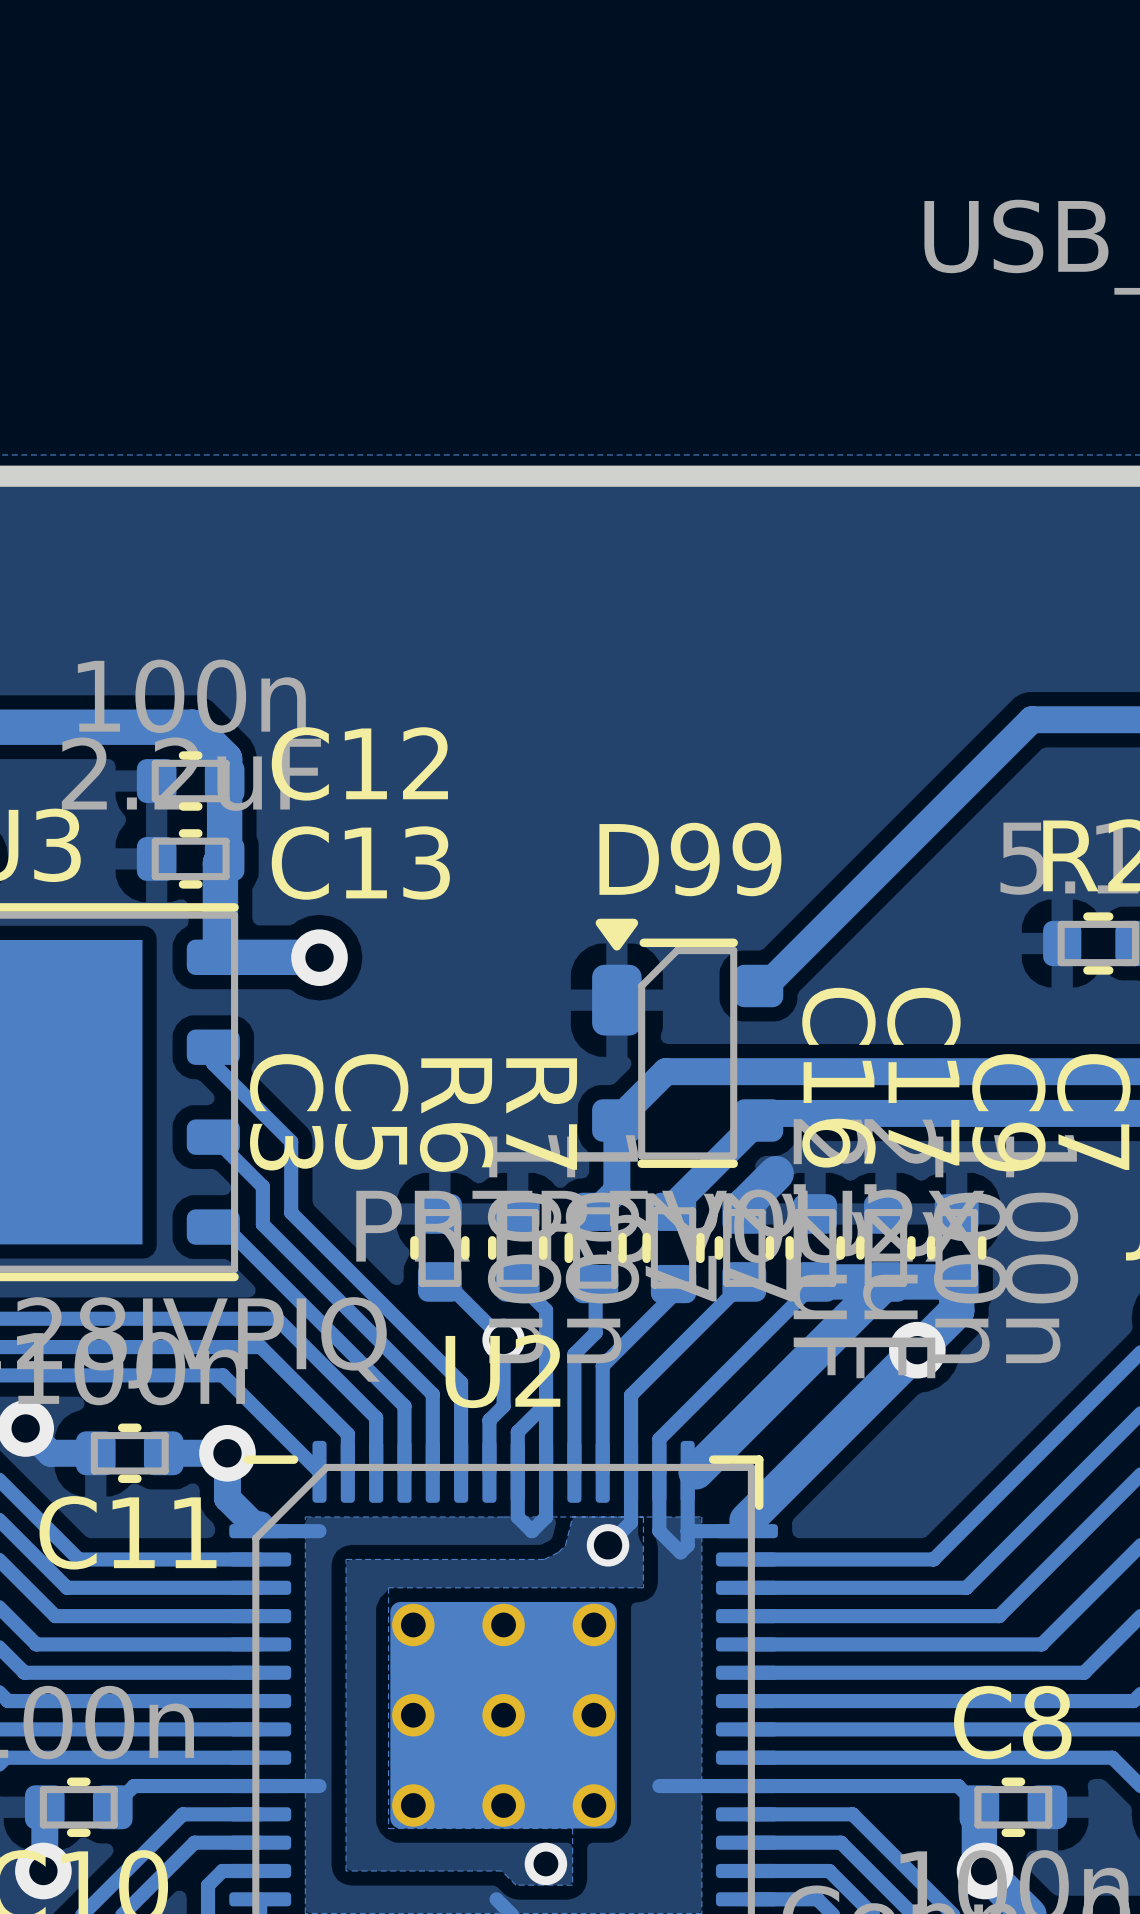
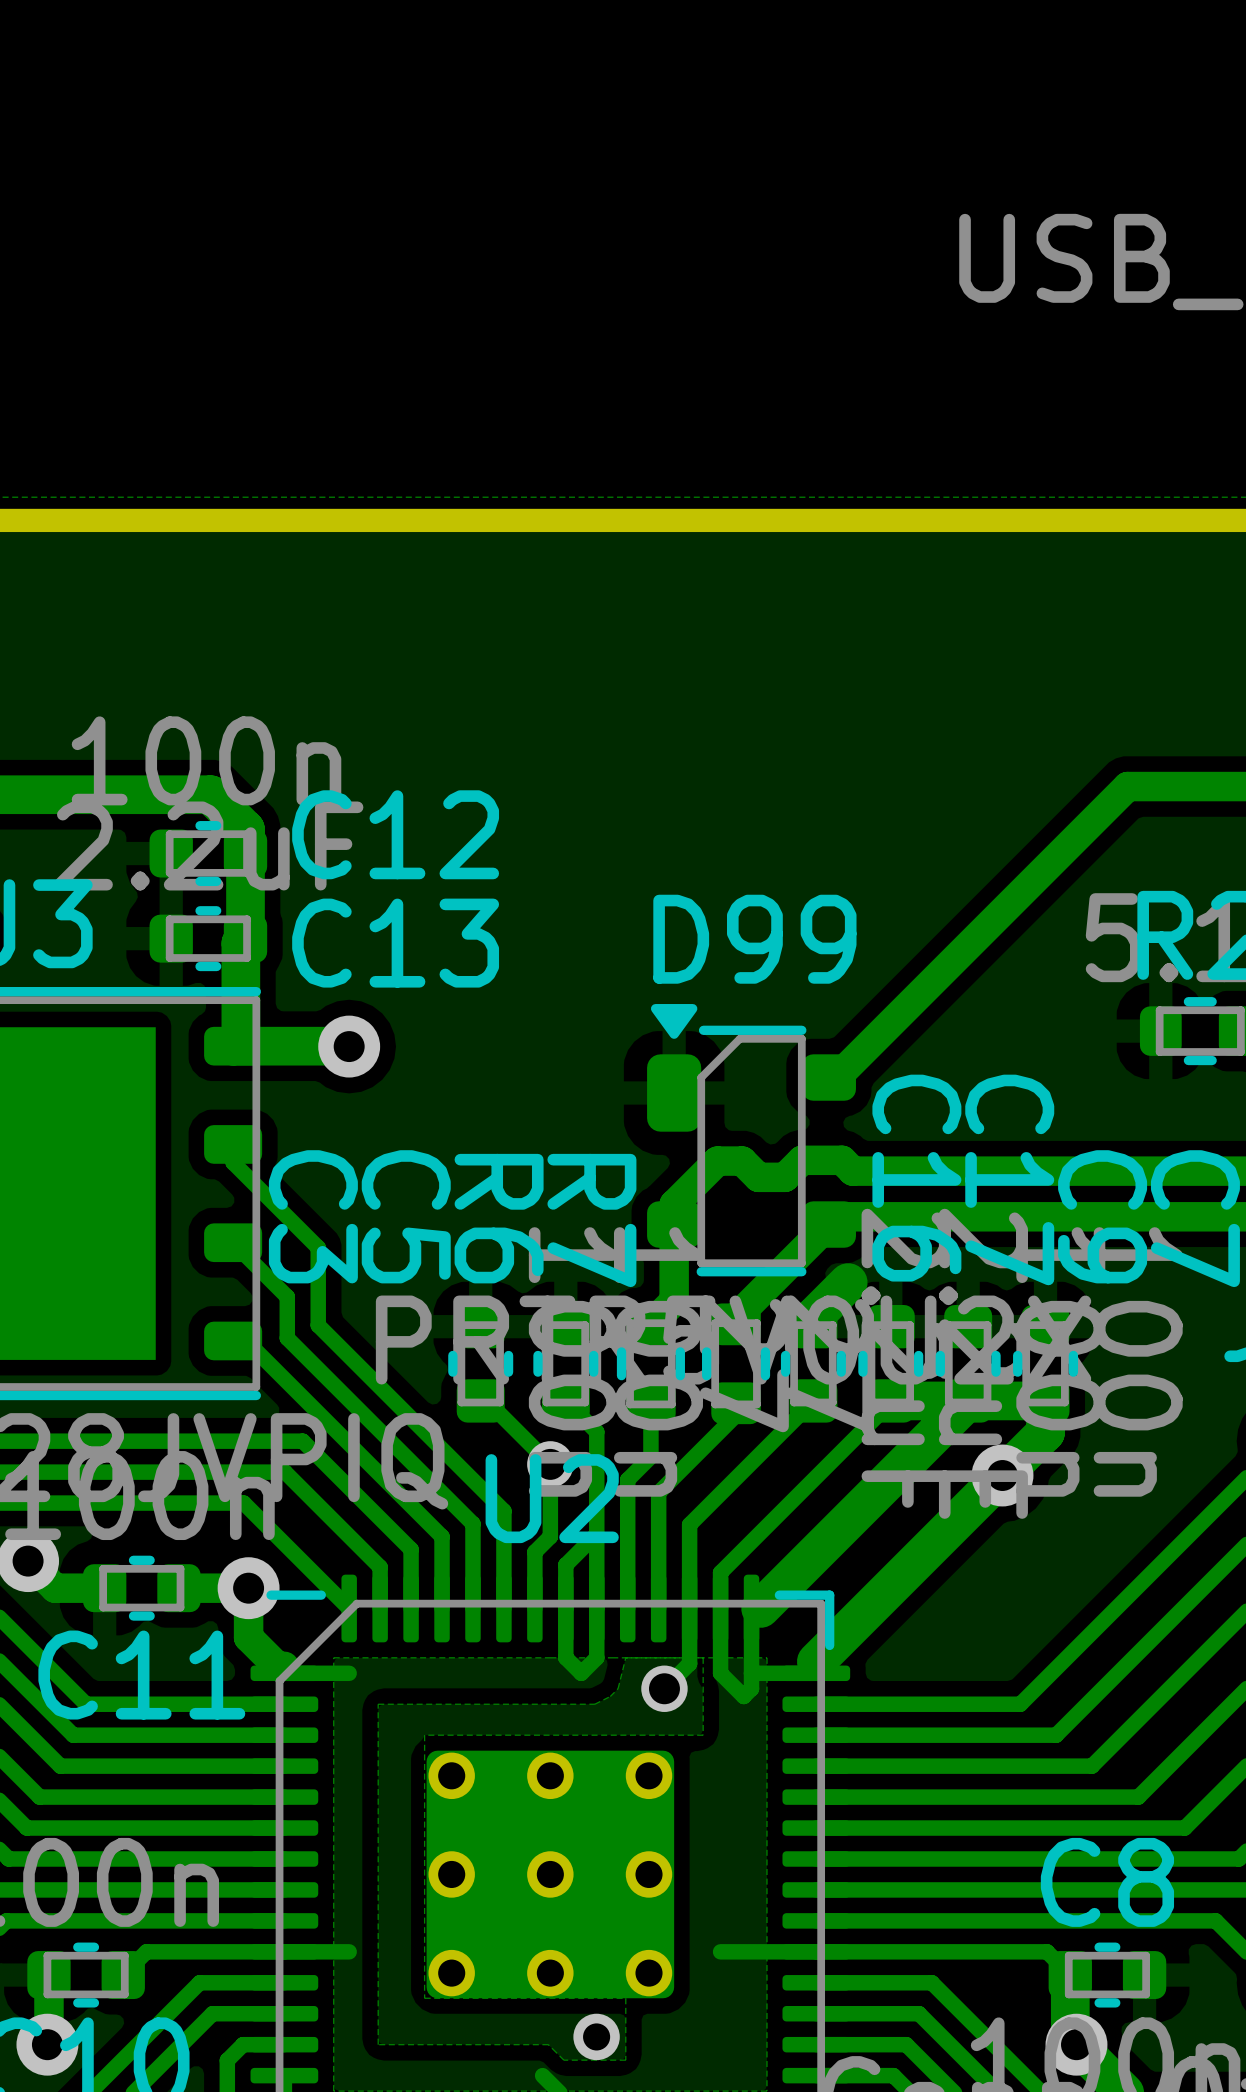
track: (780, 1071) (665, 1071) (616, 1120) -> (852, 1171) (842, 1160) (801, 1160) (784, 1177) (758, 1177) (742, 1161) (717, 1161) (674, 1204) (674, 1224)

